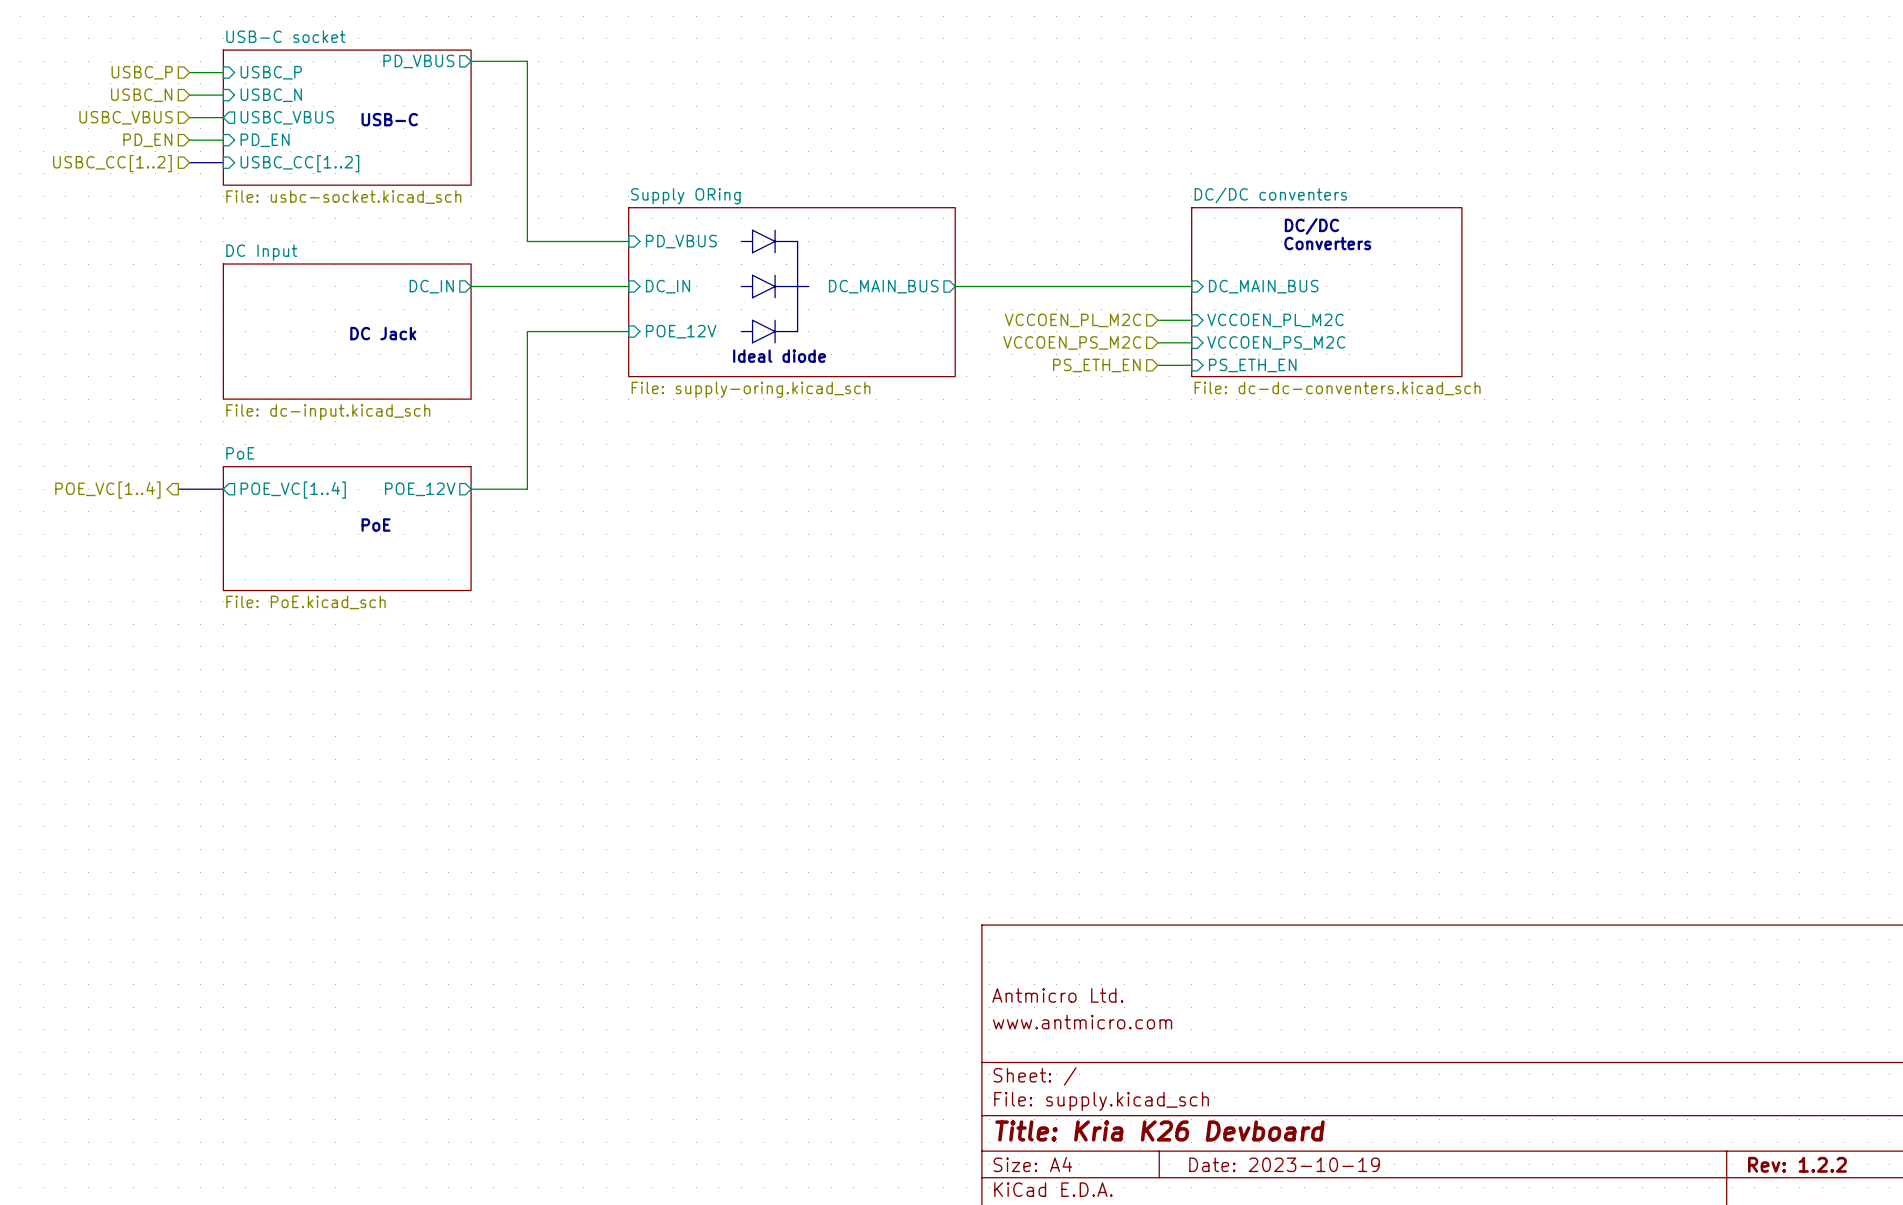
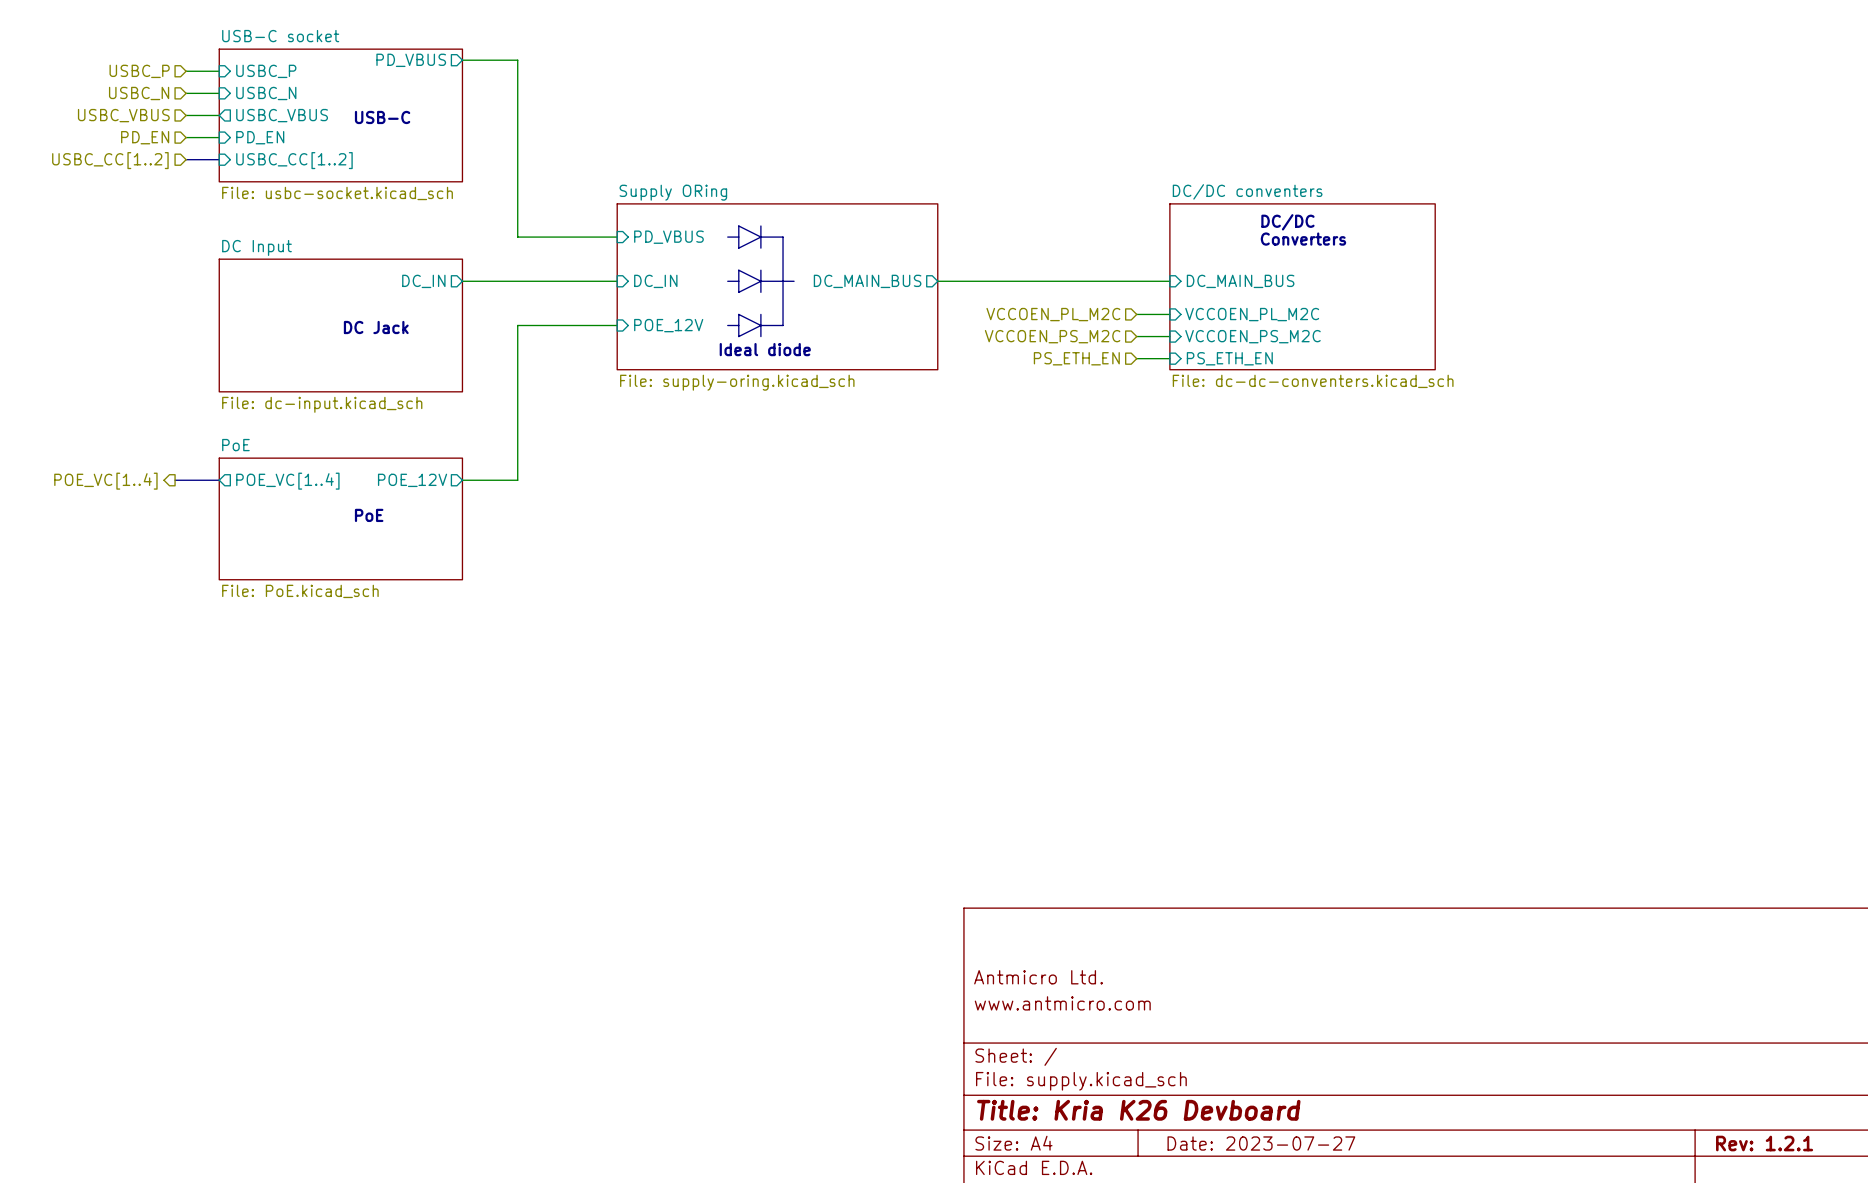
title block: Date: 2023-10-19 (1284, 1164) -> Date: 2023-07-27 (1261, 1143)
title block: Rev: 1.2.2 (1797, 1164) -> Rev: 1.2.1 (1764, 1143)

